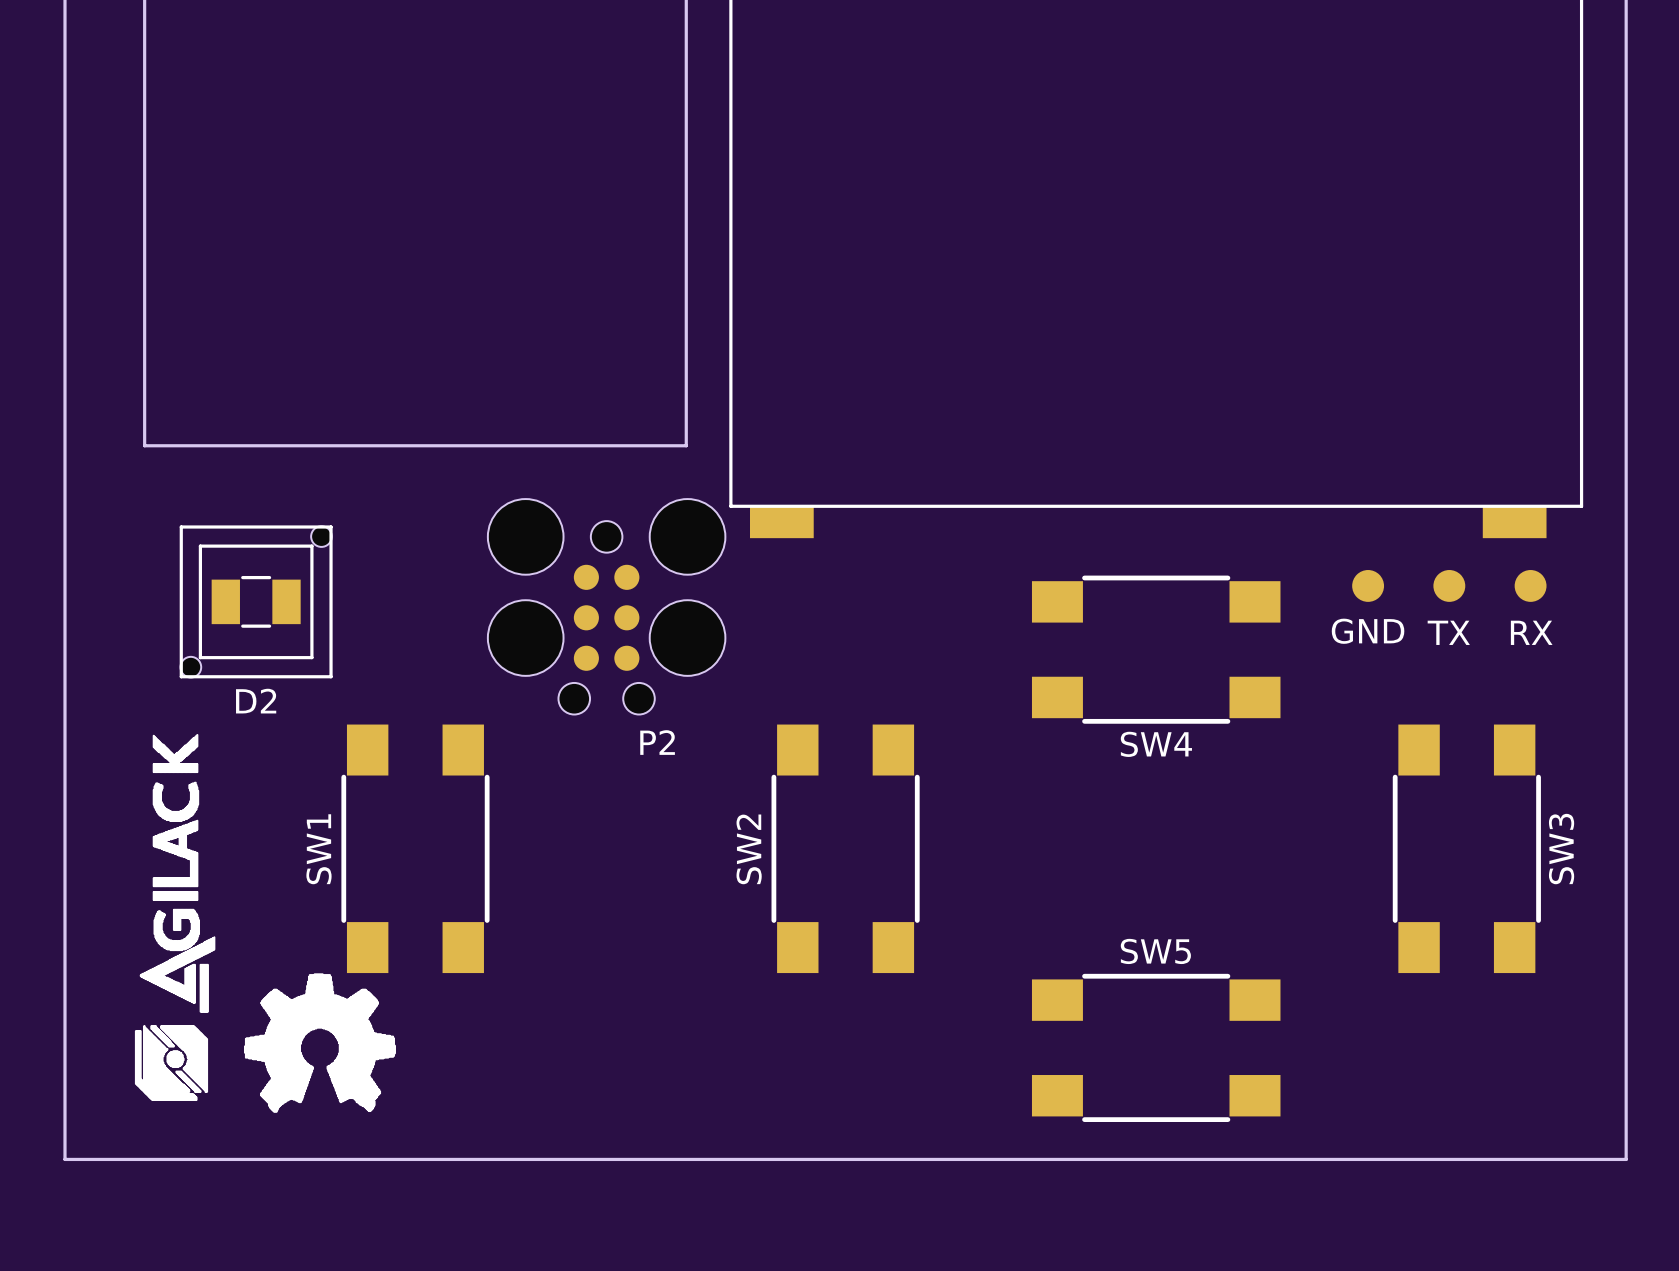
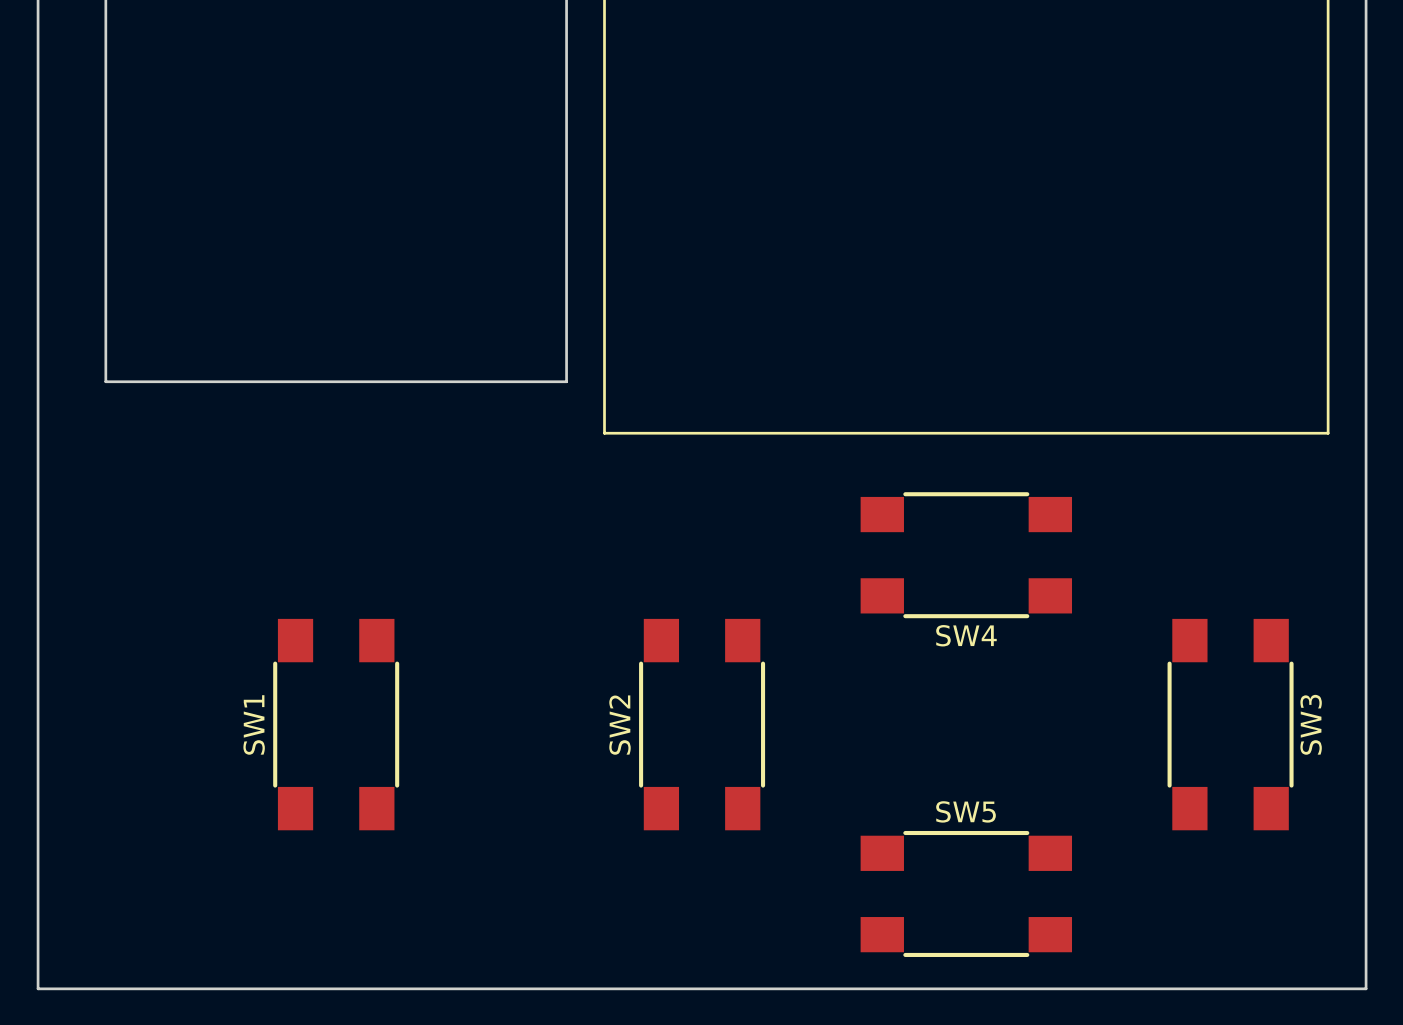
part: (781, 522) -> none
part: (1514, 522) -> none
part: (1368, 585) -> none
part: (1449, 585) -> none
part: (1530, 585) -> none
D2: (256, 601) -> none
part: (256, 601) -> none
P2: (606, 606) -> none
text: GND (1368, 631) -> none
text: TX (1448, 632) -> none
text: RX (1531, 632) -> none
drawing: [135, 734, 396, 1113] -> none

